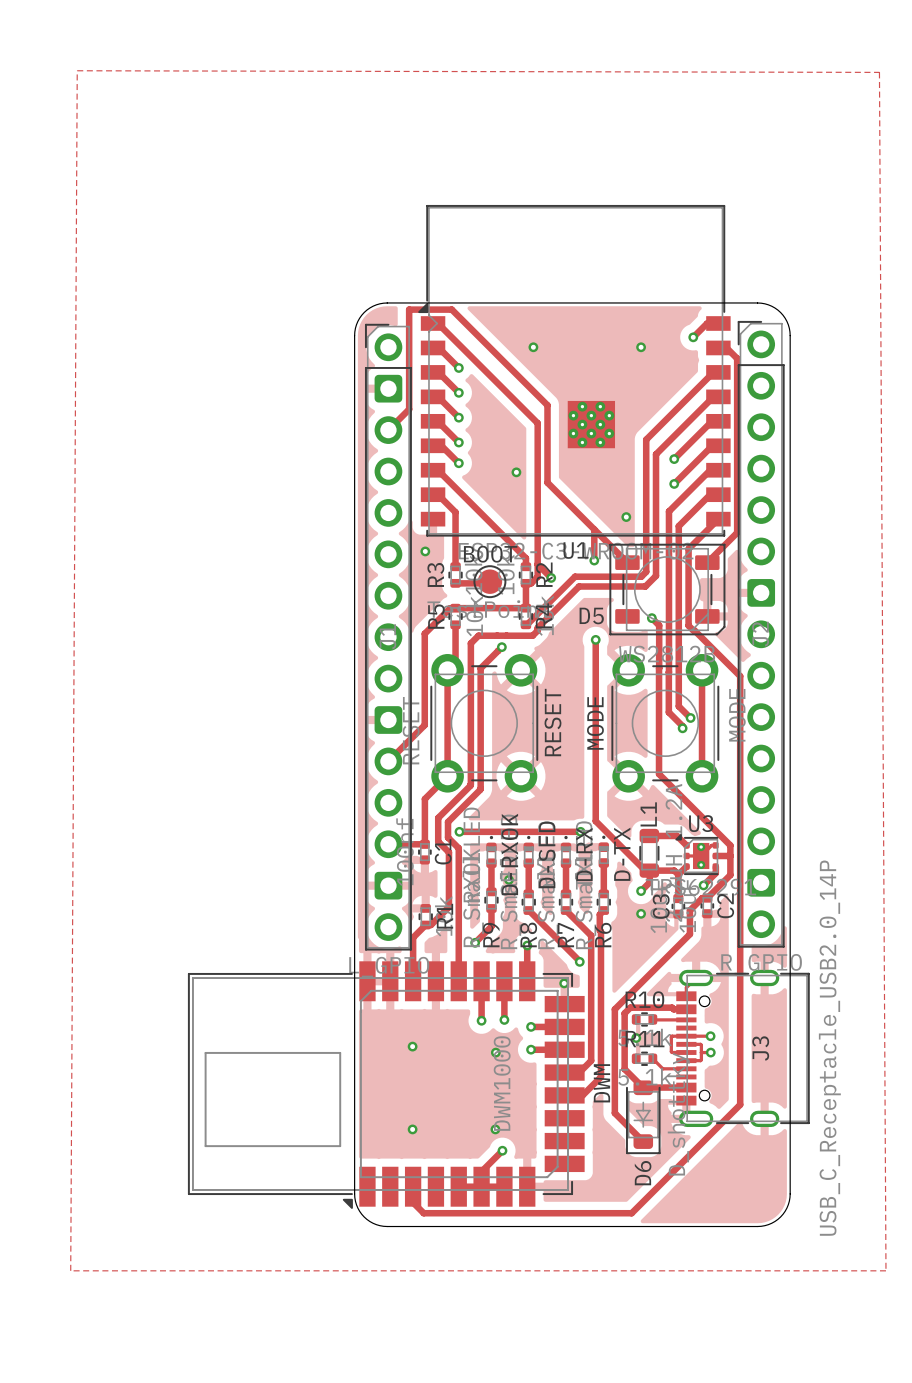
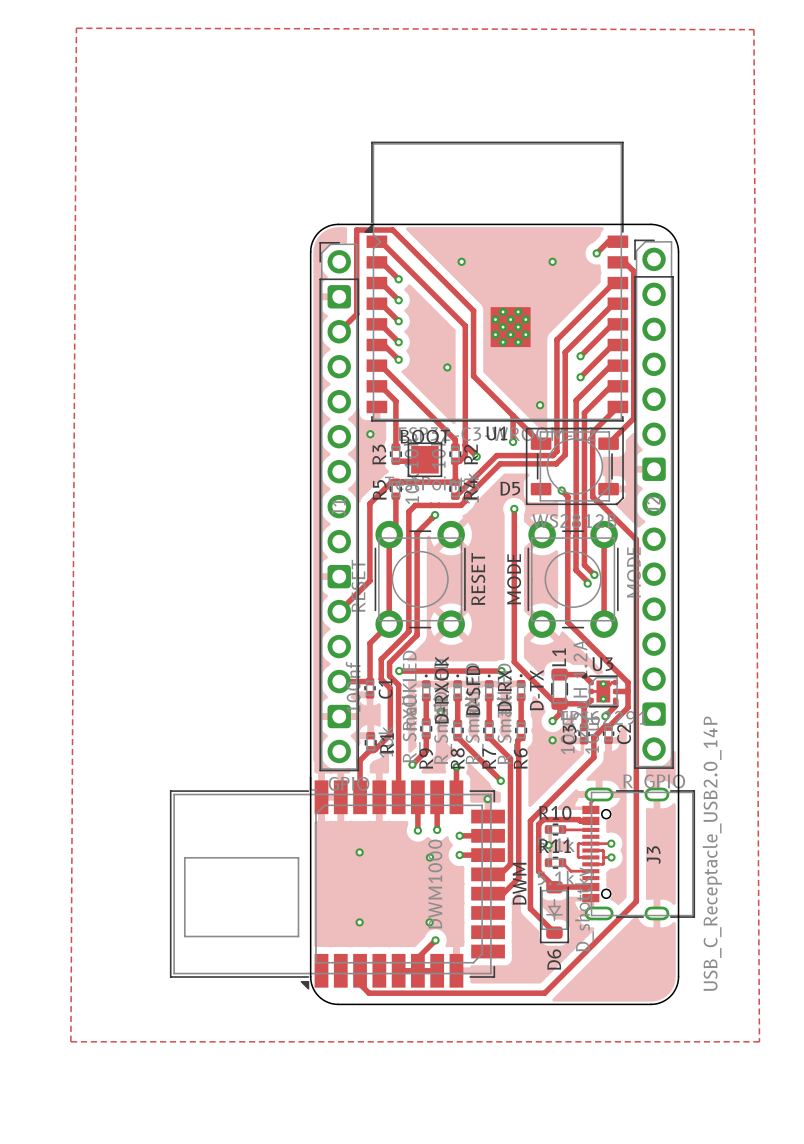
BOOT footprint: [473, 565, 507, 599] -> [407, 442, 443, 478]

